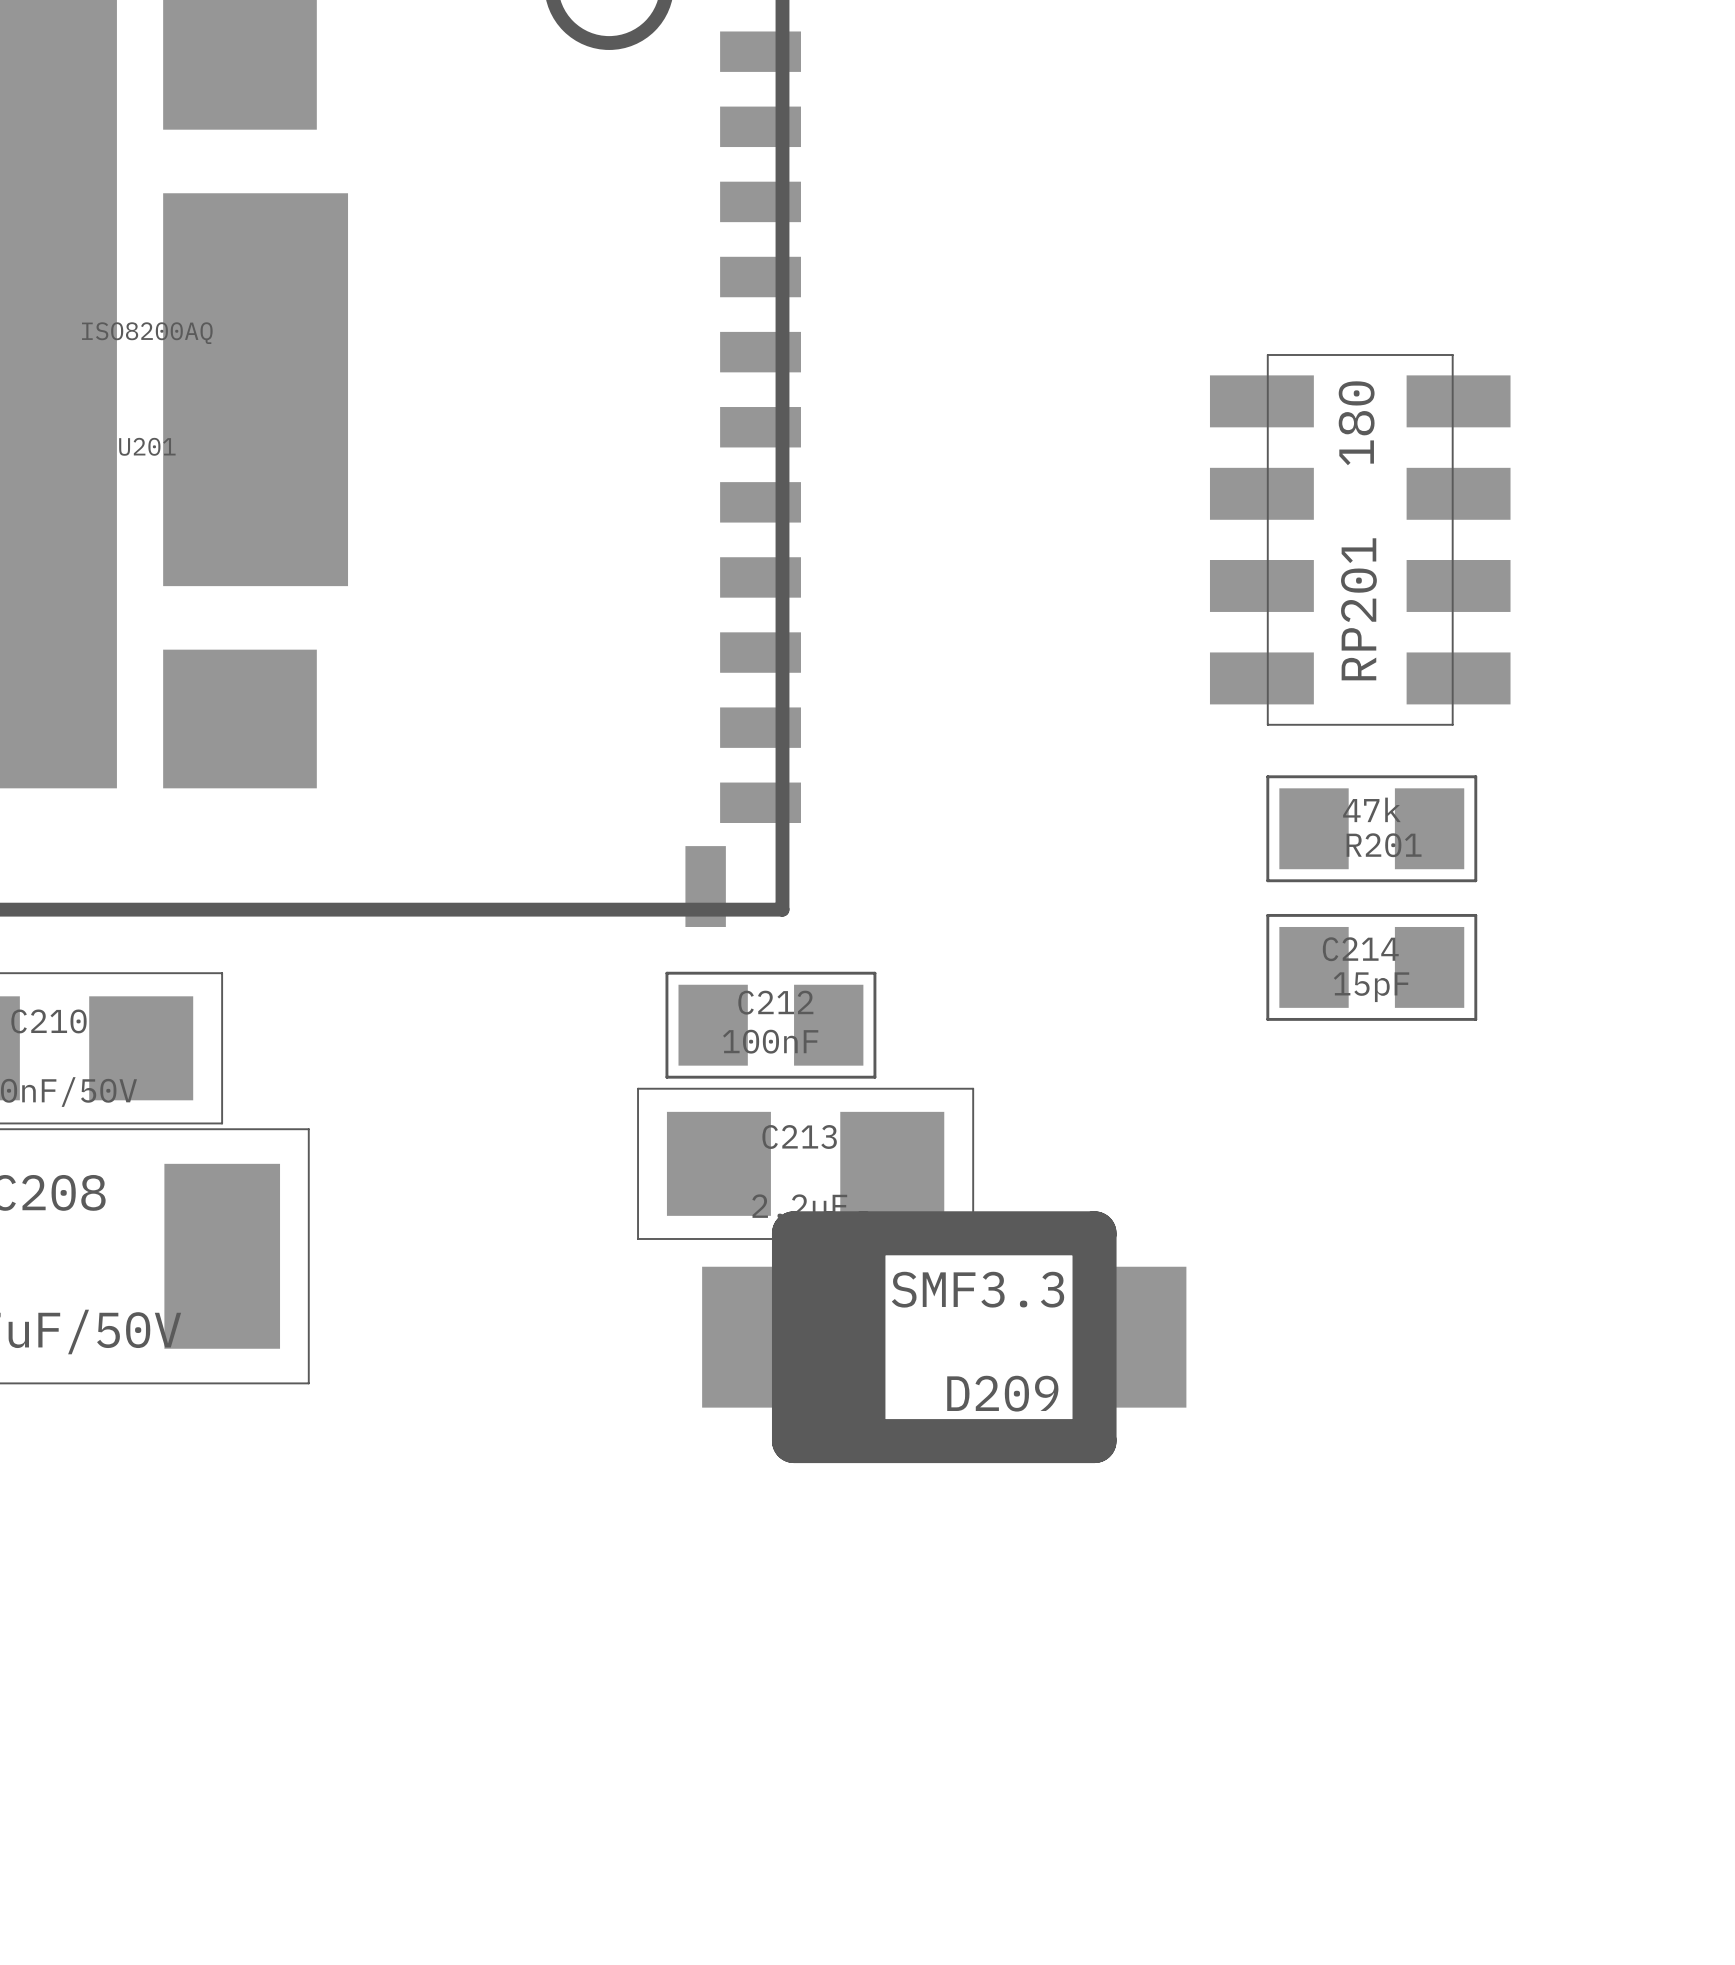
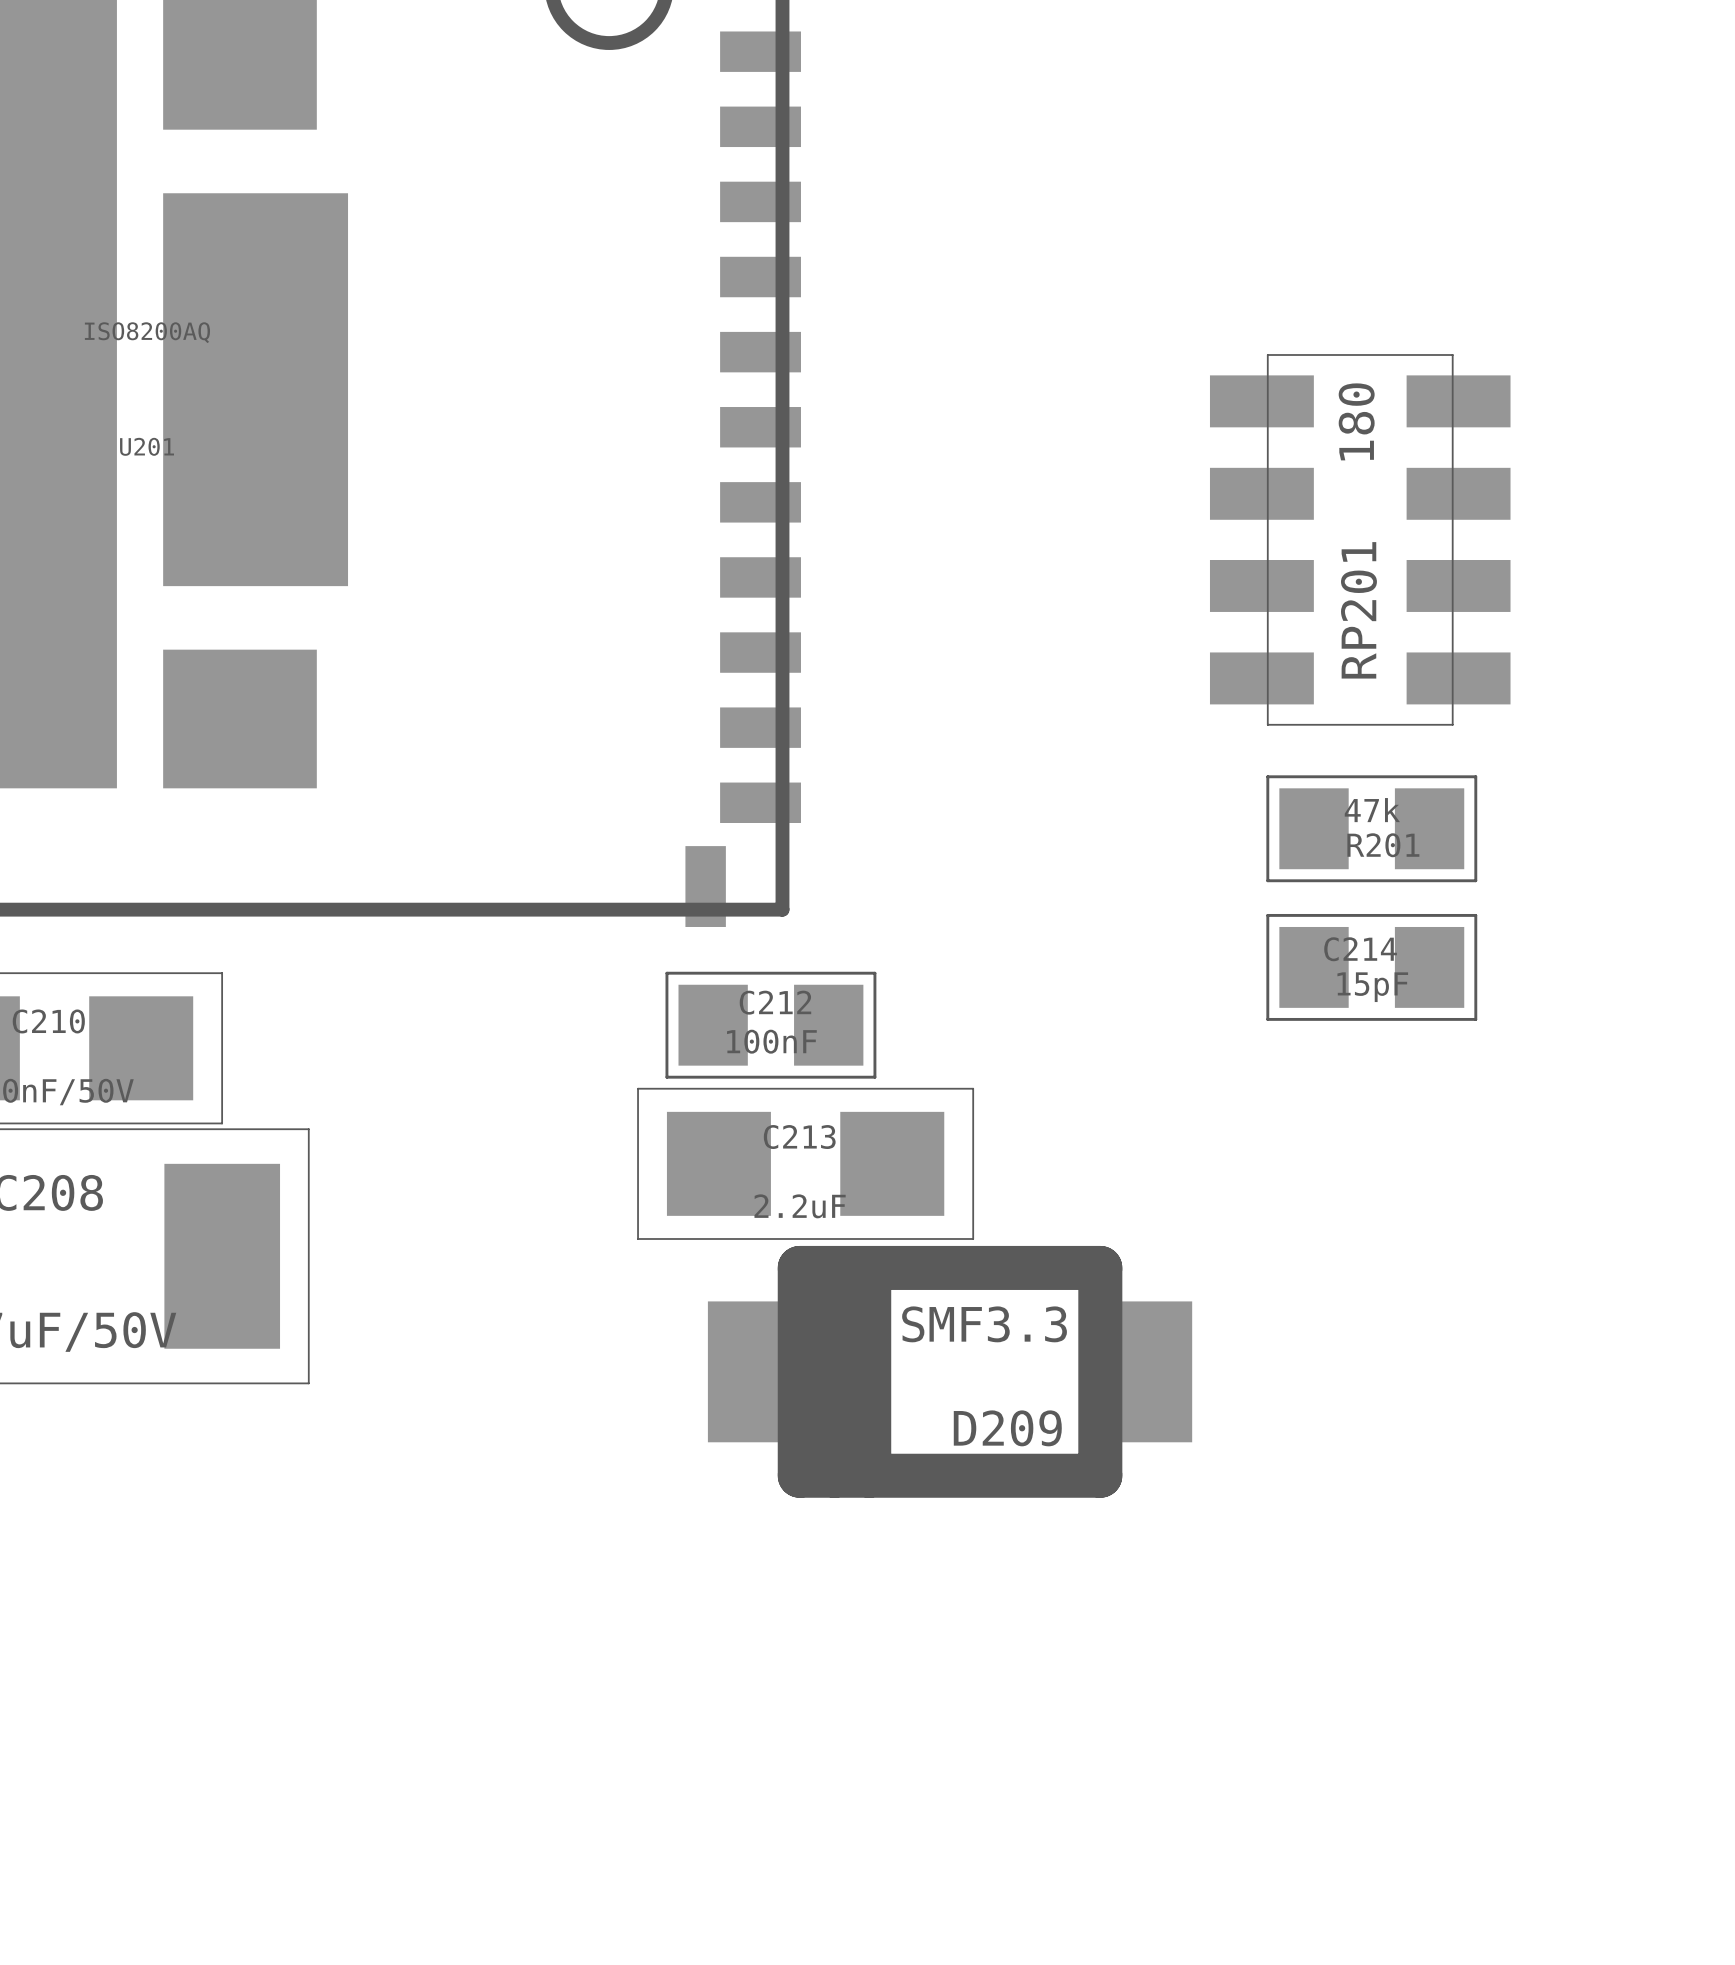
D209 position: (944, 1337) -> (950, 1371)

